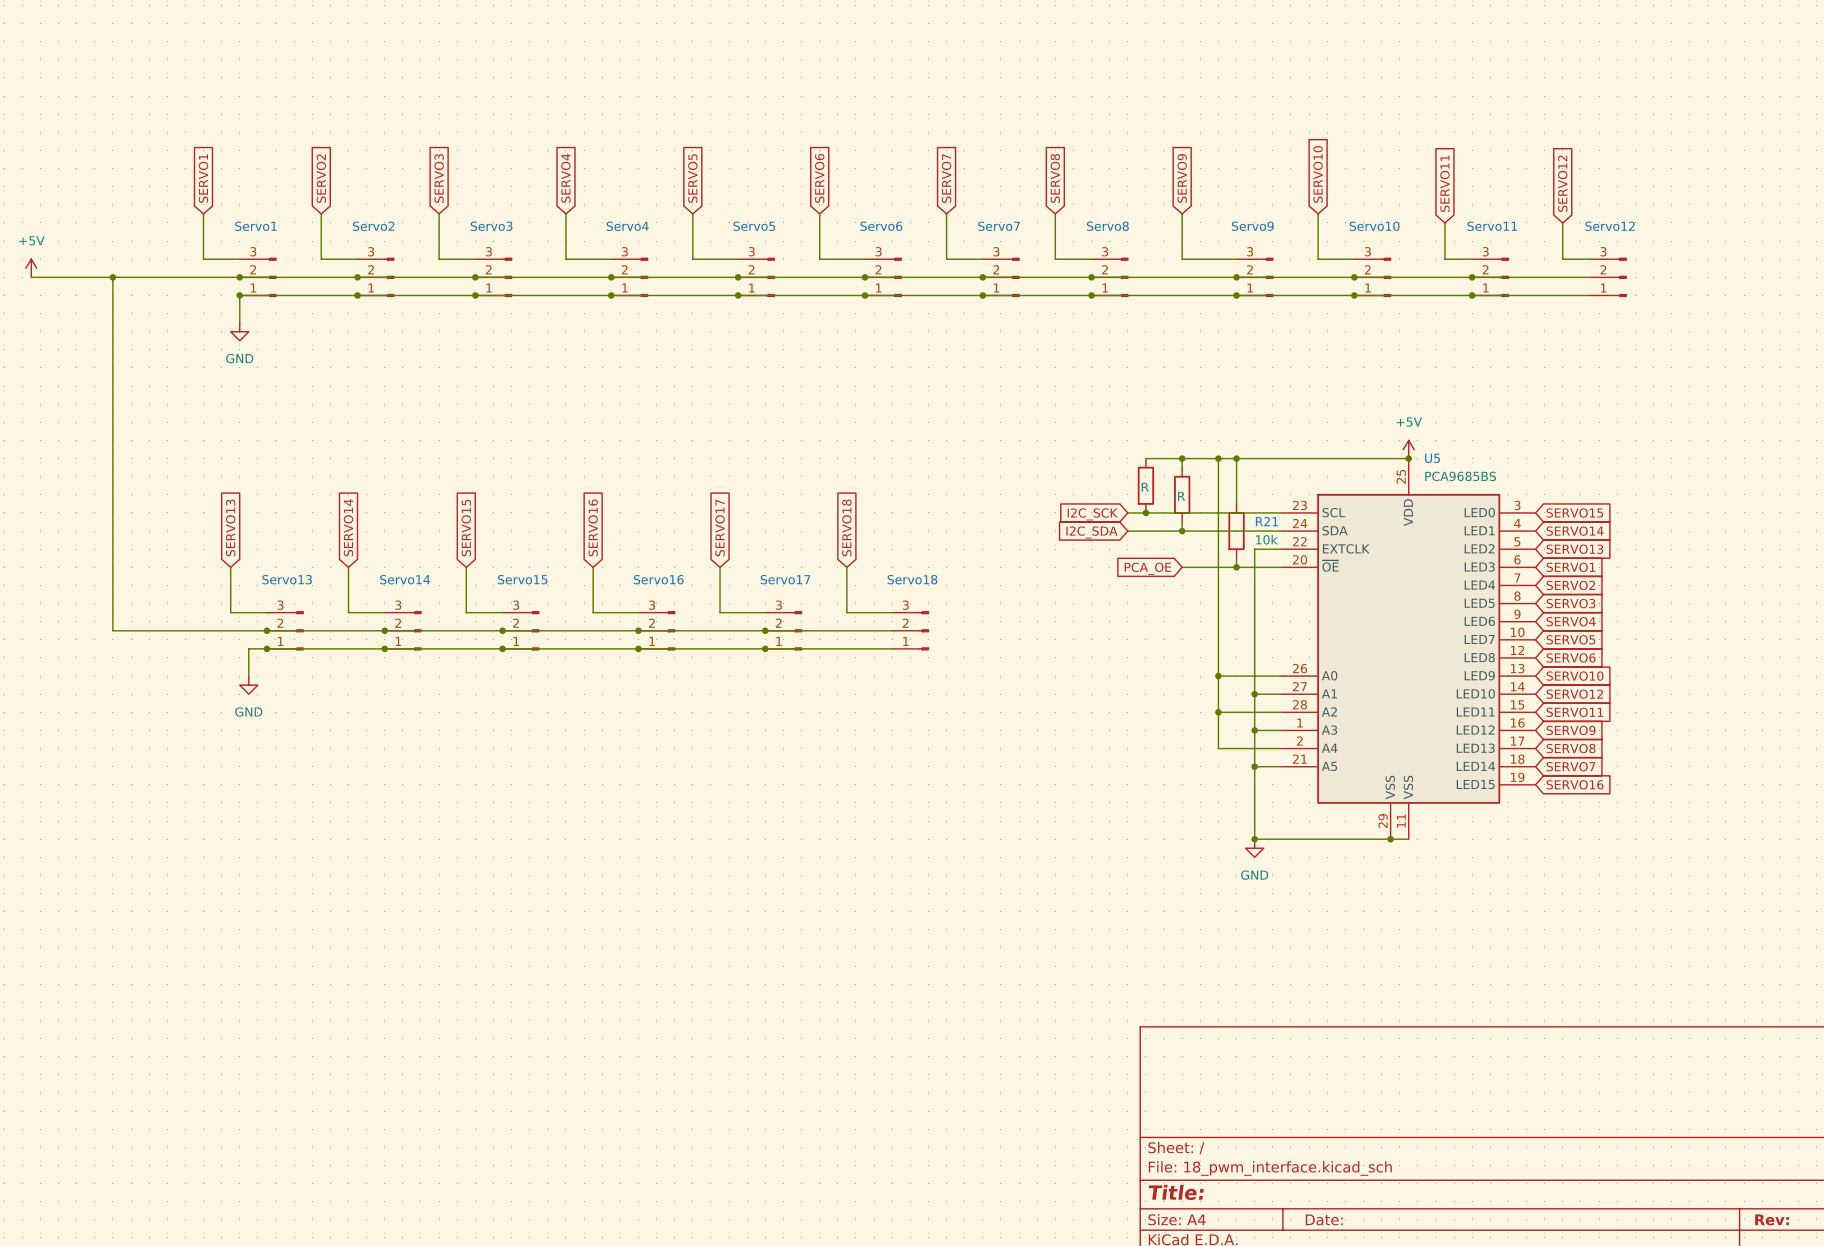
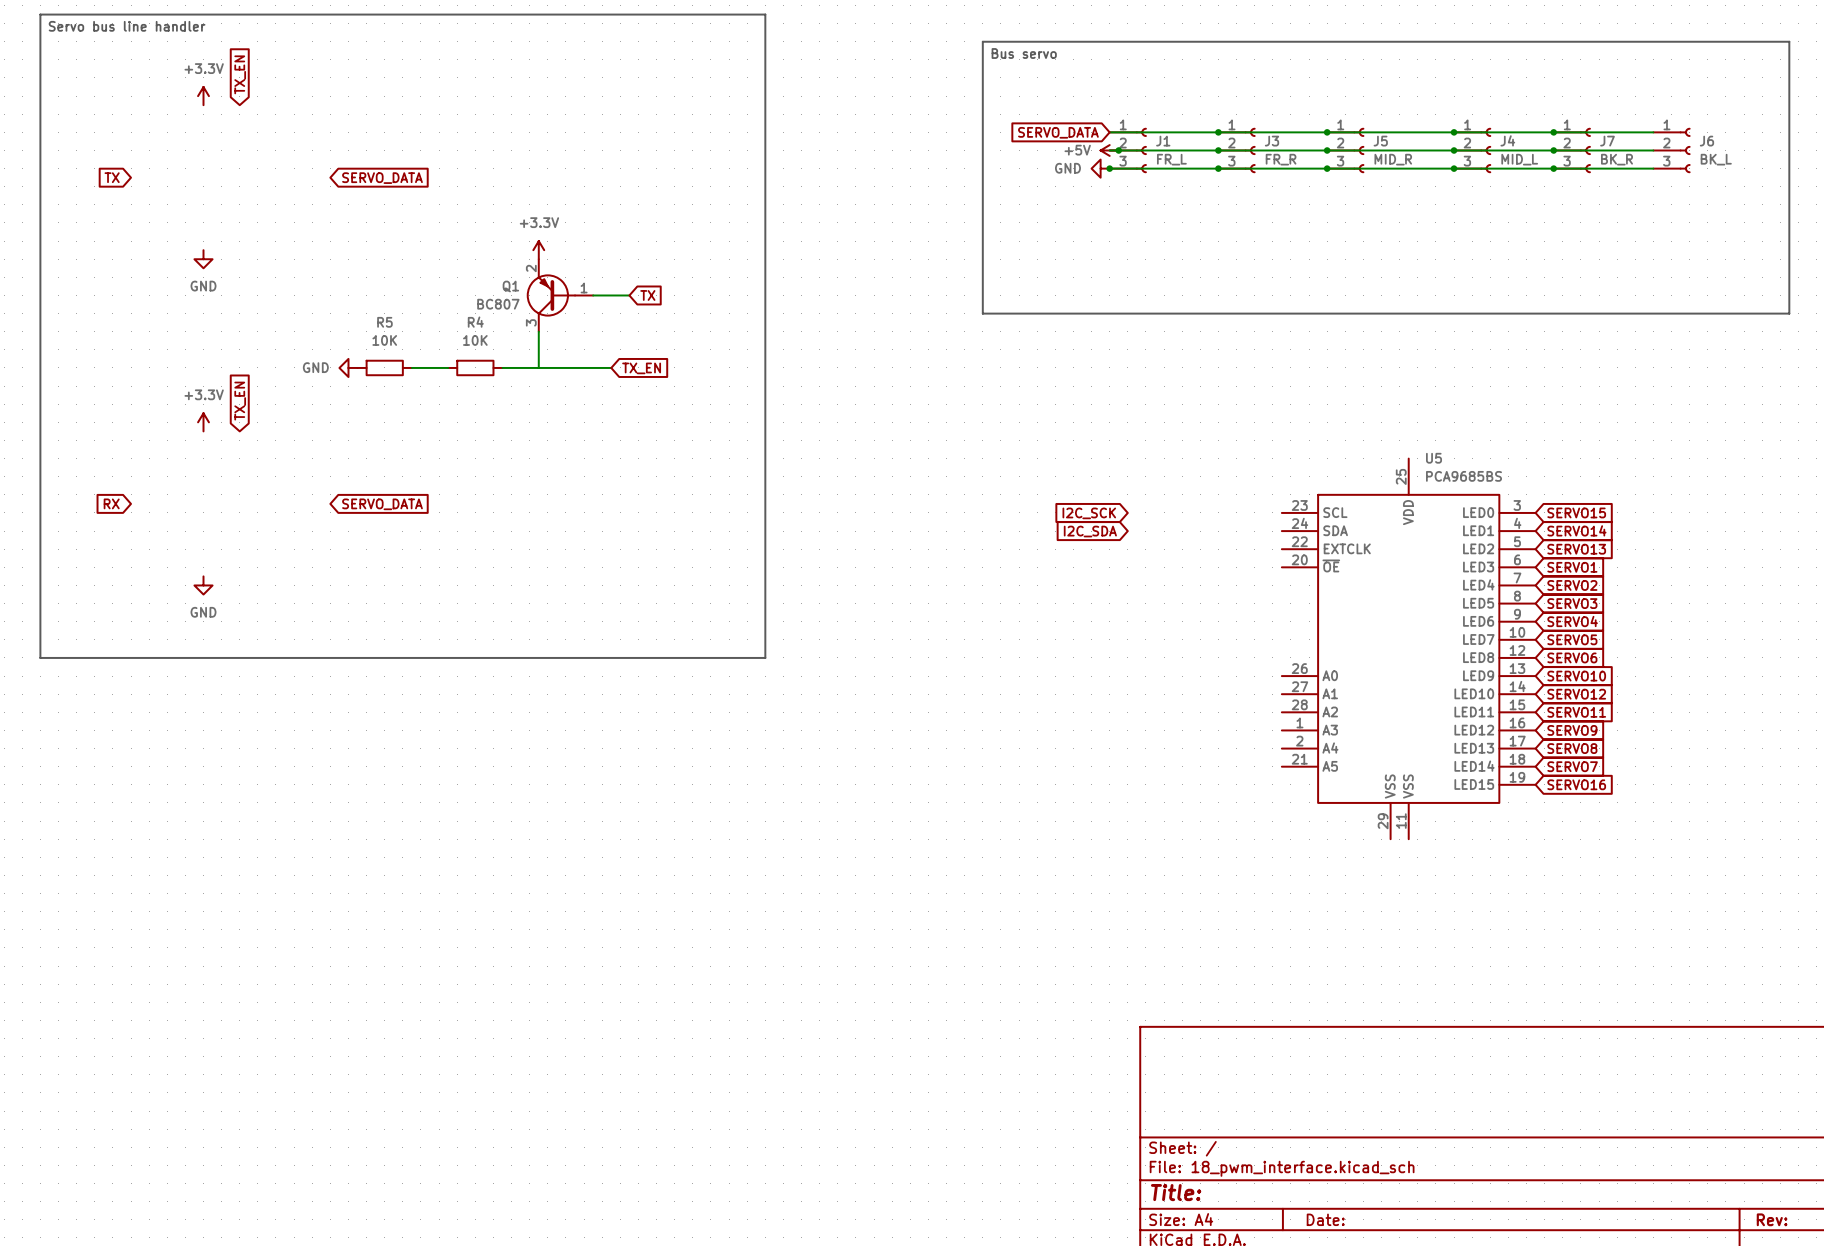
line: none -> (40, 14) (765, 14) (765, 657) (40, 657) (40, 14)
text: none -> Servo bus line handler (127, 26)
line: none -> (982, 41) (1789, 41) (1789, 313) (982, 313) (982, 41)
text: none -> Bus servo (1024, 53)
global label: none -> TX_EN (240, 74)
power symbol: none -> +3.3V (203, 96)
wire: none -> (1109, 132) (1653, 132)
junction: none -> (1218, 132)
junction: none -> (1327, 132)
junction: none -> (1454, 132)
junction: none -> (1553, 132)
wire: none -> (1109, 150) (1653, 150)
power symbol: none -> +5V (1109, 150)
junction: none -> (1118, 150)
J1: none -> FR_L (1128, 150)
junction: none -> (1218, 150)
J3: none -> FR_R (1236, 150)
junction: none -> (1327, 150)
J5: none -> MID_R (1345, 150)
junction: none -> (1454, 150)
J4: none -> MID_L (1472, 150)
junction: none -> (1553, 150)
J7: none -> BK_R (1572, 150)
J6: none -> BK_L (1671, 150)
power symbol: none -> GND (1100, 168)
wire: none -> (1109, 168) (1653, 168)
junction: none -> (1109, 168)
junction: none -> (1218, 168)
junction: none -> (1327, 168)
junction: none -> (1454, 168)
junction: none -> (1553, 168)
global label: SERVO10 (1318, 174) -> none
global label: none -> TX (112, 177)
global label: SERVO1 (203, 178) -> none
global label: SERVO2 (321, 178) -> SERVO_DATA (382, 178)
global label: SERVO3 (439, 178) -> none
global label: SERVO4 (565, 178) -> none
global label: SERVO5 (692, 178) -> none
global label: SERVO6 (819, 178) -> none
global label: SERVO7 (946, 178) -> none
global label: SERVO8 (1055, 178) -> SERVO_DATA (1058, 132)
global label: SERVO9 (1182, 178) -> none
global label: SERVO11 (1444, 183) -> none
global label: SERVO12 (1562, 183) -> none
wire: (203, 213) (203, 259) (239, 259) -> none
wire: (321, 213) (321, 259) (357, 259) -> none
wire: (439, 213) (439, 259) (475, 259) -> none
wire: (565, 213) (565, 259) (611, 259) -> none
wire: (692, 213) (692, 259) (738, 259) -> none
wire: (819, 213) (819, 259) (865, 259) -> none
wire: (946, 213) (946, 259) (982, 259) -> none
wire: (1055, 213) (1055, 259) (1091, 259) -> none
wire: (1182, 213) (1182, 259) (1236, 259) -> none
wire: (1318, 213) (1318, 259) (1354, 259) -> none
wire: (1444, 222) (1444, 259) (1472, 259) -> none
wire: (1562, 222) (1562, 259) (1589, 259) -> none
power symbol: none -> +3.3V (538, 250)
power symbol: none -> GND (203, 259)
power symbol: +5V (31, 268) -> none
wire: (31, 277) (1589, 277) -> none
wire: (112, 277) (112, 630) (892, 630) -> none
junction: (112, 277) -> none
junction: (239, 277) -> none
Servo1: (258, 277) -> none
junction: (357, 277) -> none
Servo2: (375, 277) -> none
junction: (475, 277) -> none
Servo3: (493, 277) -> none
junction: (611, 277) -> none
Servo4: (629, 277) -> none
junction: (738, 277) -> none
Servo5: (756, 277) -> none
junction: (865, 277) -> none
Servo6: (883, 277) -> none
junction: (982, 277) -> none
Servo7: (1001, 277) -> none
junction: (1091, 277) -> none
Servo8: (1109, 277) -> none
junction: (1236, 277) -> none
Servo9: (1254, 277) -> none
junction: (1354, 277) -> none
Servo10: (1372, 277) -> none
junction: (1472, 277) -> none
Servo11: (1490, 277) -> none
Servo12: (1608, 277) -> none
junction: (239, 295) -> none
junction: (357, 295) -> none
junction: (475, 295) -> none
Q1: none -> BC807 (559, 295)
wire: (593, 295) (239, 295) (239, 322) -> none
junction: (611, 295) -> none
wire: (629, 295) (1589, 295) -> none
global label: none -> TX (647, 295)
junction: (738, 295) -> none
junction: (865, 295) -> none
junction: (982, 295) -> none
junction: (1091, 295) -> none
junction: (1236, 295) -> none
junction: (1354, 295) -> none
junction: (1472, 295) -> none
power symbol: GND (239, 331) -> none
wire: none -> (538, 331) (538, 367)
power symbol: none -> GND (348, 367)
R5: none -> 10K (384, 367)
wire: none -> (411, 367) (448, 367)
R4: none -> 10K (475, 367)
wire: none -> (502, 367) (611, 367)
global label: none -> TX_EN (641, 368)
global label: none -> TX_EN (240, 401)
power symbol: none -> +3.3V (203, 422)
power symbol: +5V (1408, 449) -> none
wire: (1145, 458) (1408, 458) -> none
wire: (1182, 458) (1182, 467) -> none
junction: (1182, 458) -> none
wire: (1218, 458) (1218, 748) (1281, 748) -> none
junction: (1218, 458) -> none
wire: (1236, 458) (1236, 503) -> none
junction: (1236, 458) -> none
junction: (1408, 458) -> none
part: R (1145, 485) -> none
part: R (1182, 494) -> none
global label: none -> RX (111, 503)
global label: none -> SERVO_DATA (382, 504)
wire: (1127, 512) (1281, 512) -> none
junction: (1145, 512) -> none
wire: (1182, 522) (1182, 531) -> none
global label: SERVO13 (230, 527) -> none
global label: SERVO14 (348, 527) -> none
global label: SERVO16 (593, 527) -> none
global label: SERVO18 (846, 527) -> none
global label: SERVO15 (466, 528) -> none
global label: SERVO17 (720, 528) -> none
wire: (1127, 531) (1281, 531) -> none
junction: (1182, 531) -> none
R21: 10k (1236, 531) -> none
wire: (1281, 549) (1254, 549) (1254, 839) (1408, 839) -> none
wire: (1236, 558) (1236, 567) -> none
wire: (230, 567) (230, 612) (266, 612) -> none
wire: (348, 567) (348, 612) (384, 612) -> none
wire: (466, 567) (466, 612) (502, 612) -> none
wire: (593, 567) (593, 612) (638, 612) -> none
wire: (720, 567) (720, 612) (765, 612) -> none
wire: (846, 567) (846, 612) (892, 612) -> none
wire: (1182, 567) (1281, 567) -> none
junction: (1236, 567) -> none
global label: PCA_OE (1147, 568) -> none
junction: (266, 630) -> none
Servo13: (285, 630) -> none
junction: (384, 630) -> none
Servo14: (403, 630) -> none
junction: (502, 630) -> none
Servo15: (520, 630) -> none
junction: (638, 630) -> none
Servo16: (656, 630) -> none
junction: (765, 630) -> none
Servo17: (783, 630) -> none
Servo18: (910, 630) -> none
junction: (266, 648) -> none
junction: (384, 648) -> none
junction: (502, 648) -> none
junction: (638, 648) -> none
junction: (765, 648) -> none
wire: (892, 648) (248, 648) (248, 676) -> none
wire: (1218, 676) (1281, 676) -> none
junction: (1218, 676) -> none
power symbol position: GND (248, 685) -> GND (203, 585)
wire: (1254, 694) (1281, 694) -> none
junction: (1254, 694) -> none
wire: (1218, 712) (1281, 712) -> none
junction: (1218, 712) -> none
wire: (1254, 730) (1281, 730) -> none
junction: (1254, 730) -> none
wire: (1254, 766) (1281, 766) -> none
junction: (1254, 766) -> none
junction: (1254, 839) -> none
junction: (1390, 839) -> none
power symbol: GND (1254, 848) -> none

